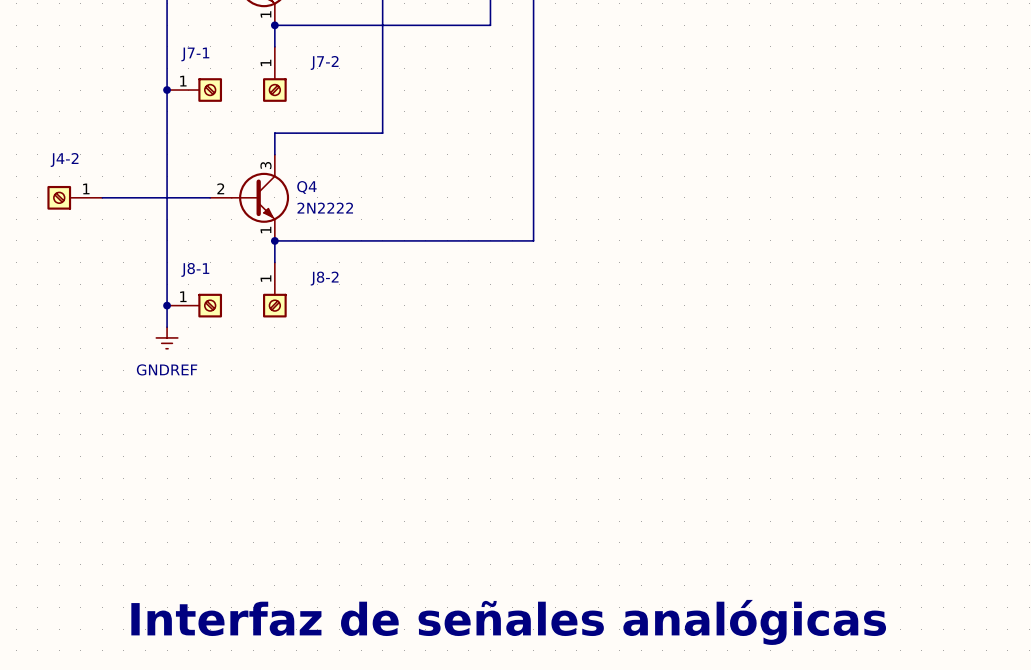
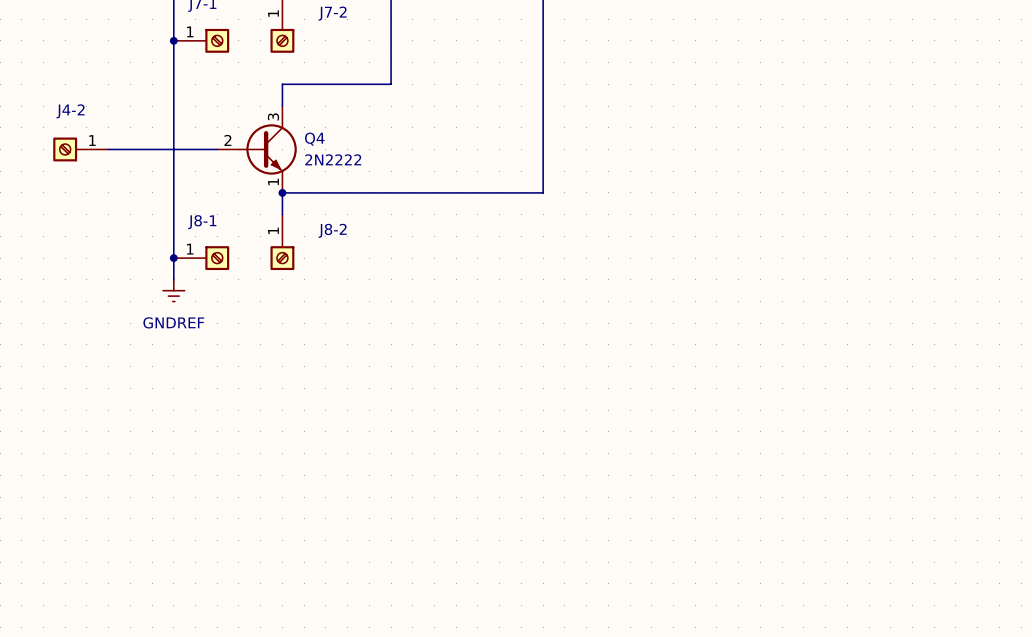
text: Interfaz de señales analógicas (508, 622) -> none

